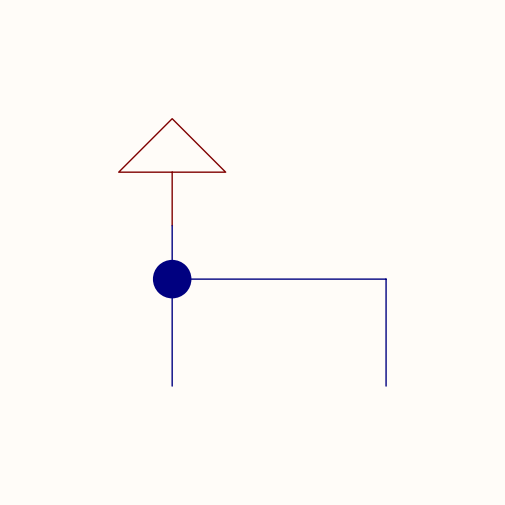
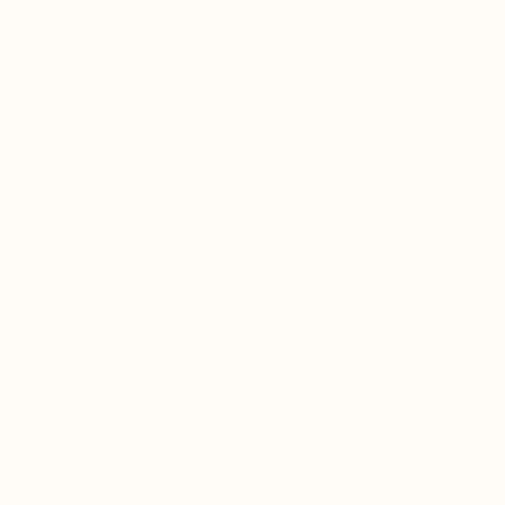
power symbol: (172, 172) -> none
wire: (172, 225) (172, 386) -> none
wire: (172, 279) (386, 279) (386, 386) -> none
junction: (172, 279) -> none

